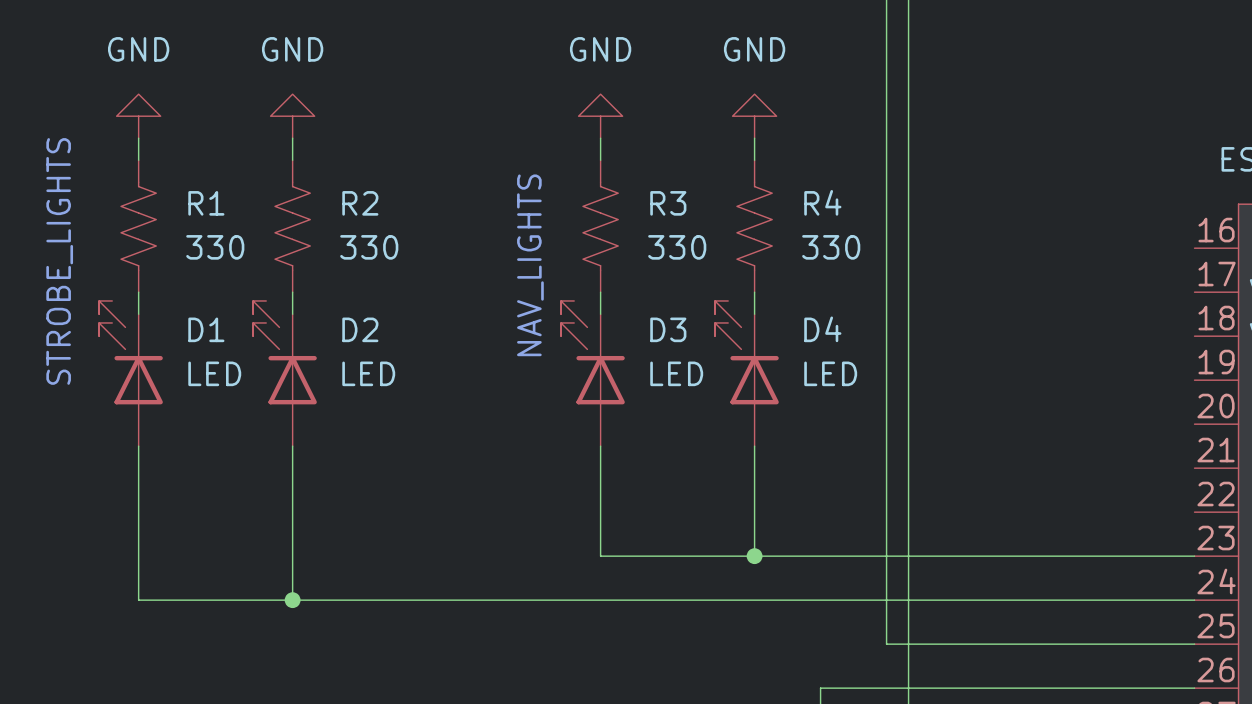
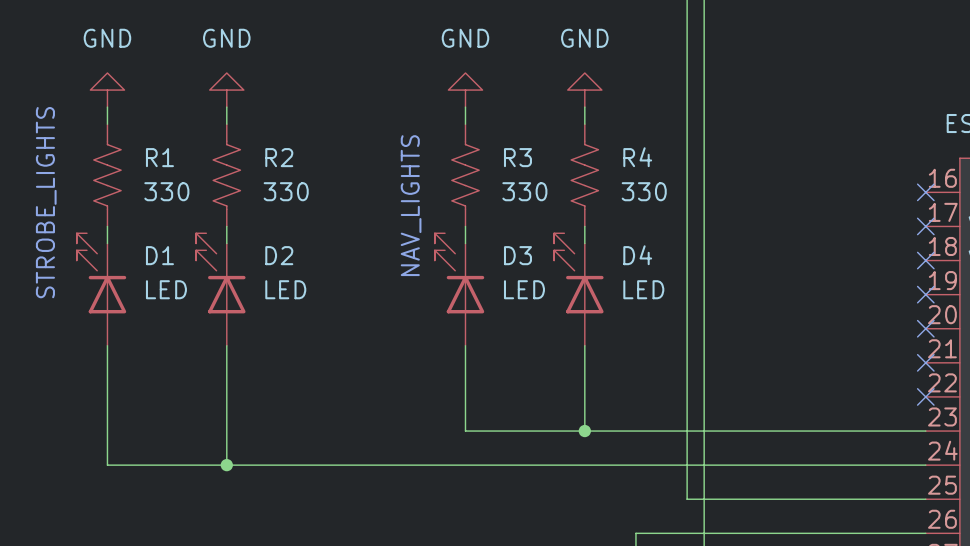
no-connect mark: none -> (925, 192)
no-connect mark: none -> (925, 226)
no-connect mark: none -> (925, 260)
no-connect mark: none -> (925, 294)
no-connect mark: none -> (925, 328)
no-connect mark: none -> (925, 362)
no-connect mark: none -> (925, 396)

